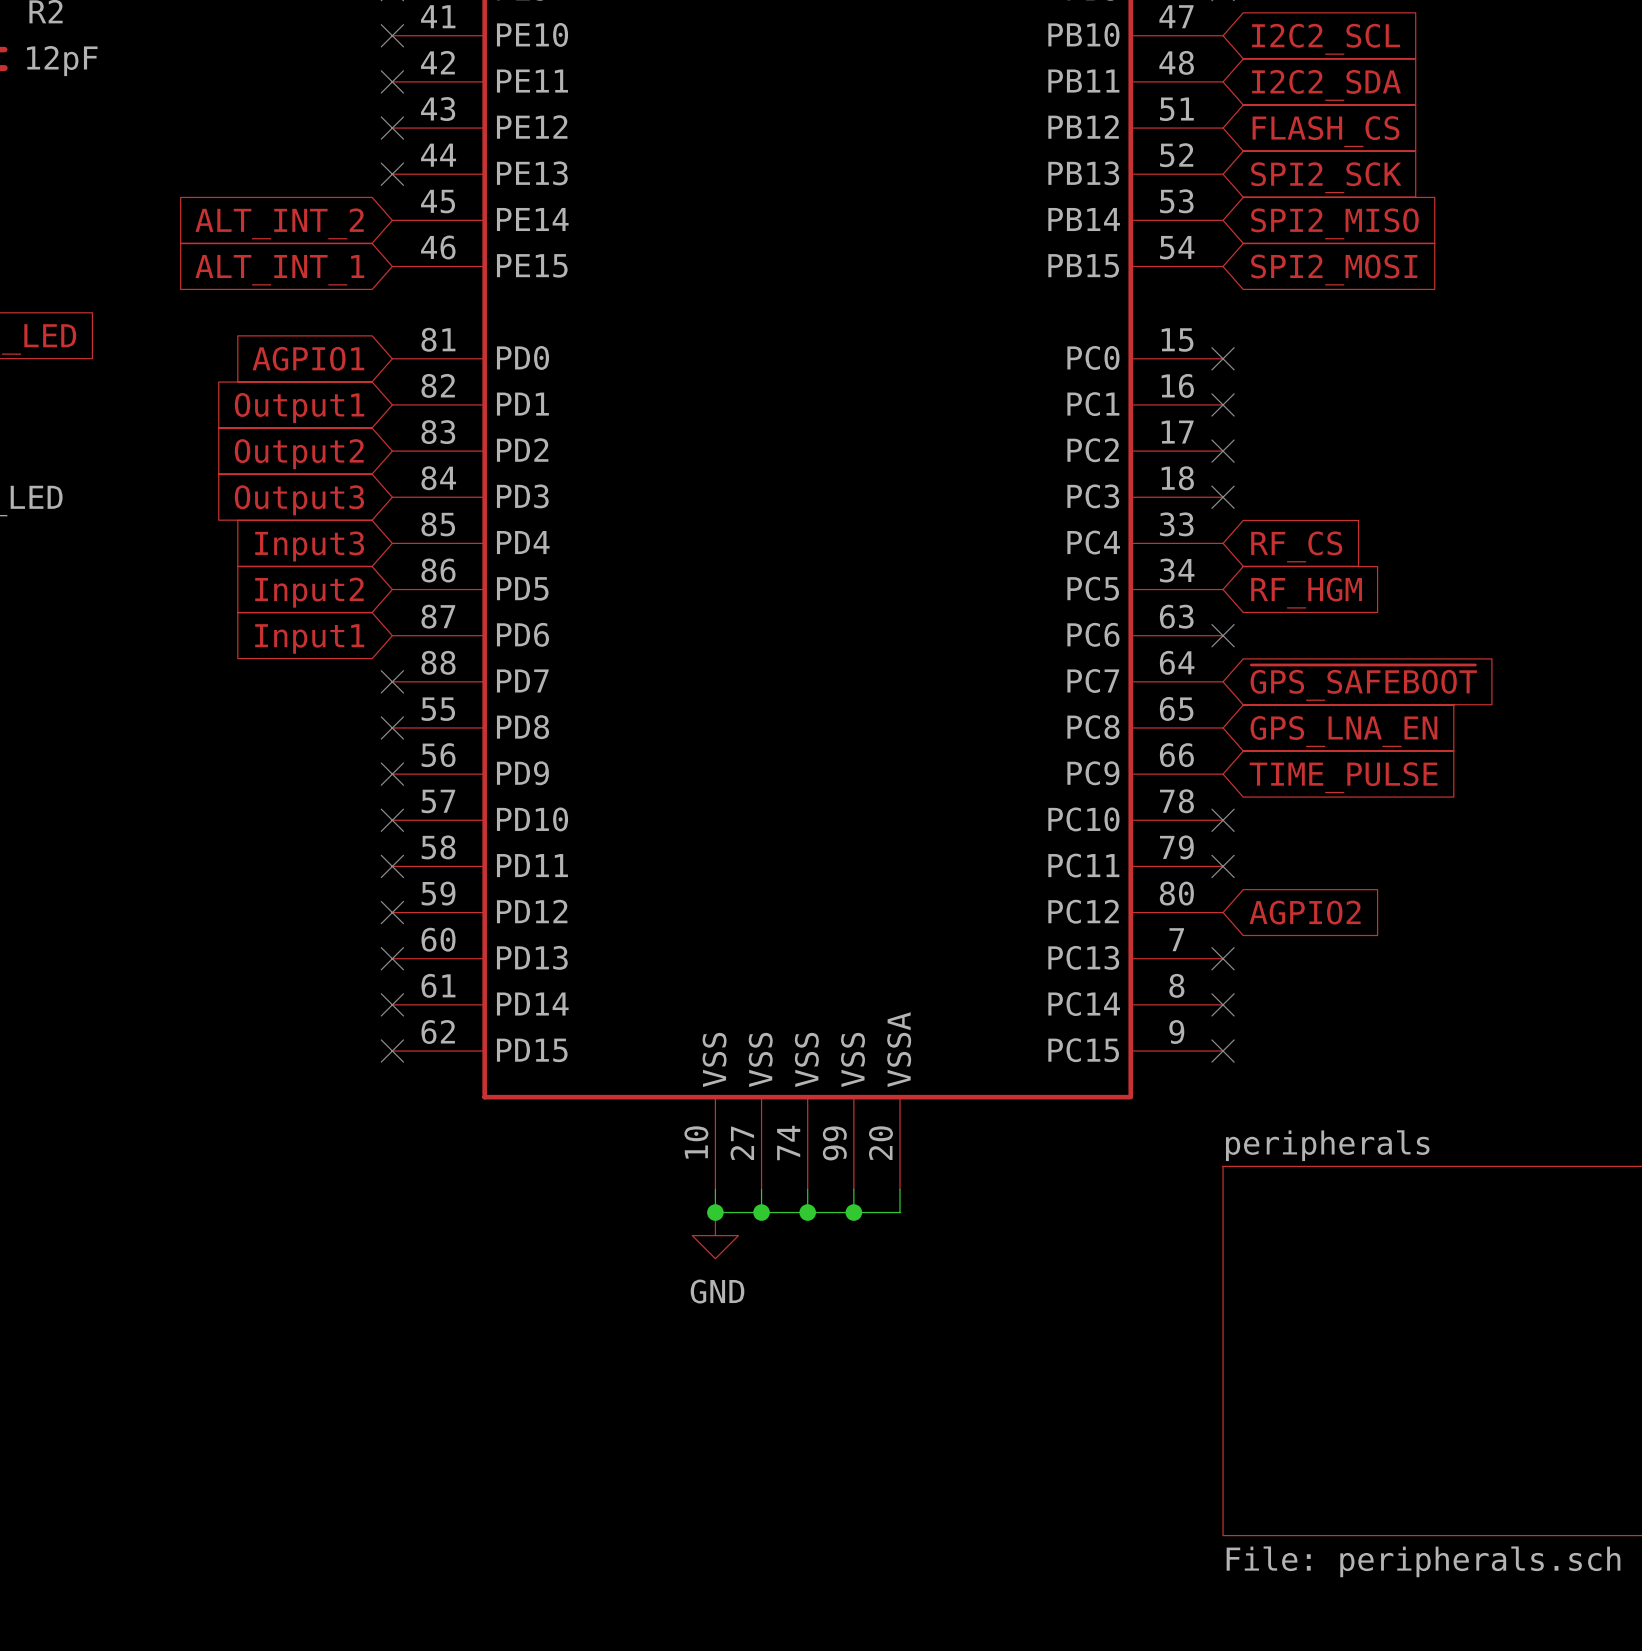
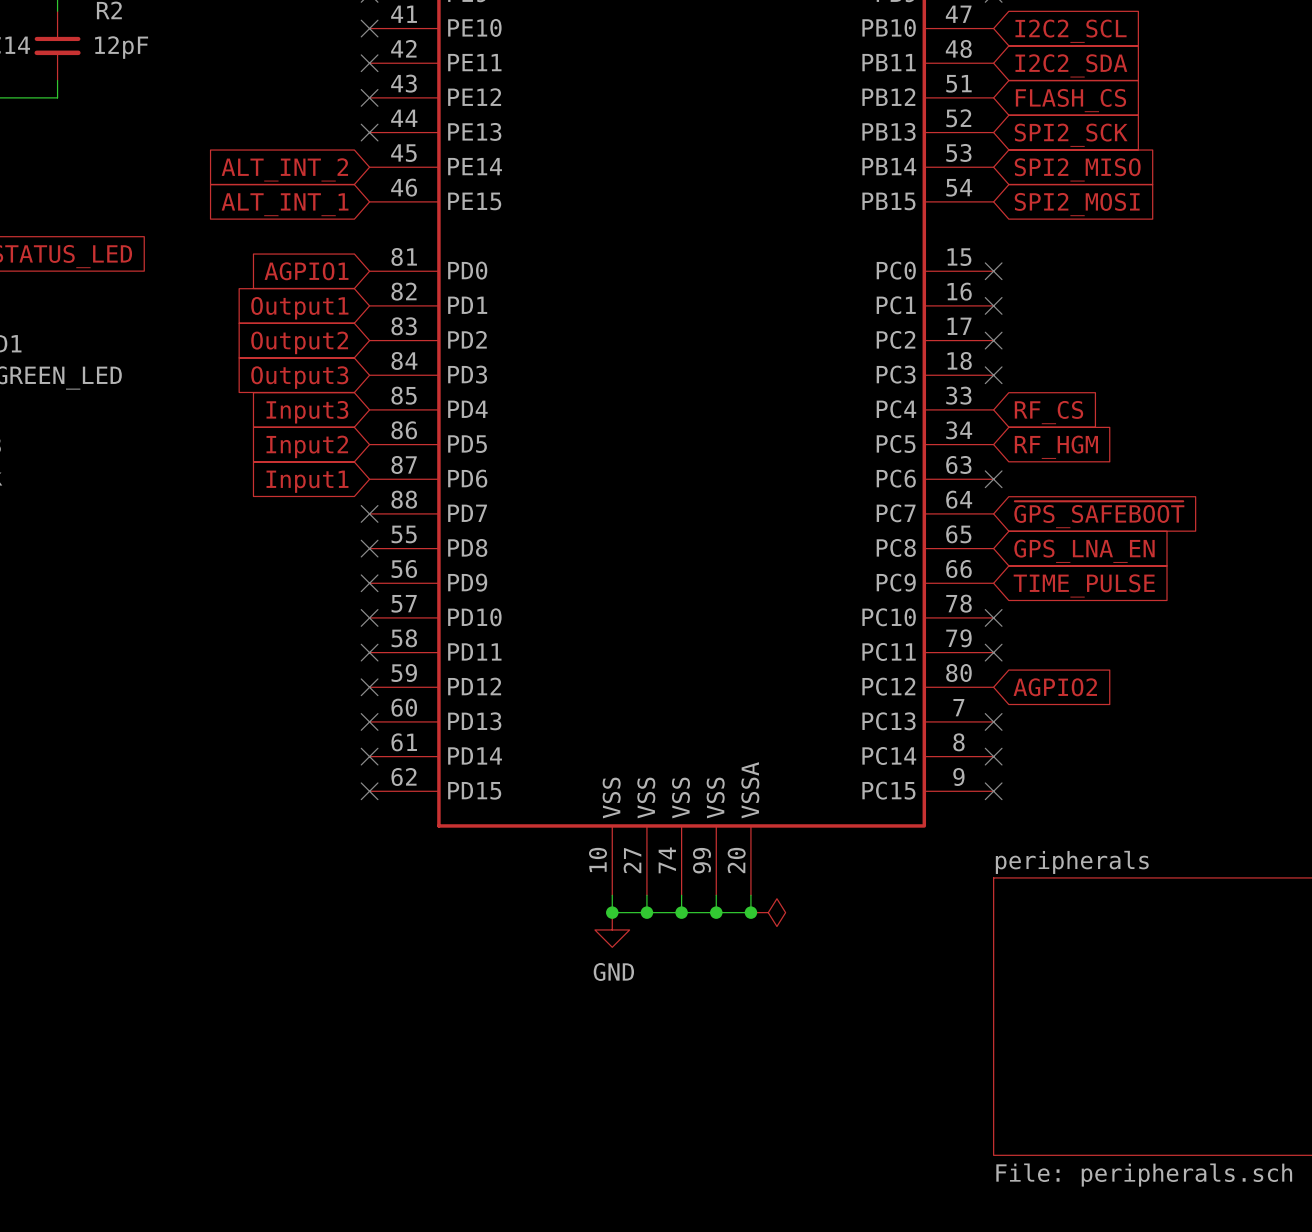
junction: none -> (750, 912)
power symbol: none -> (768, 912)

